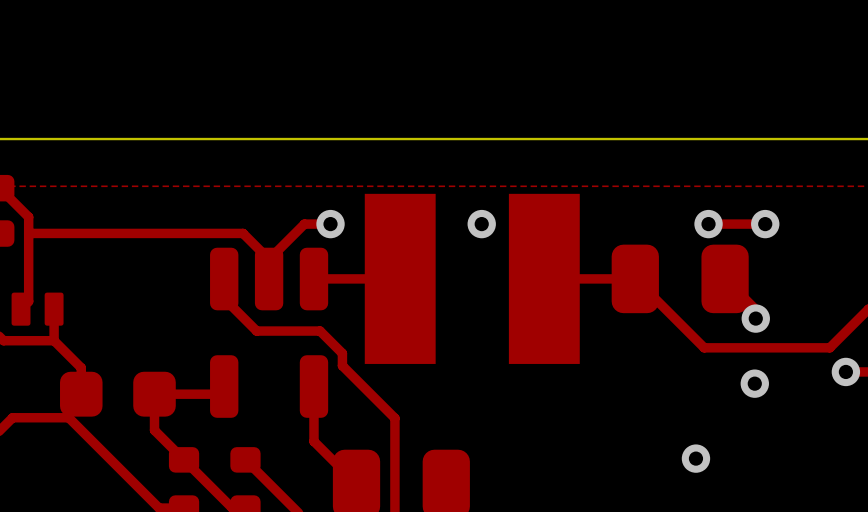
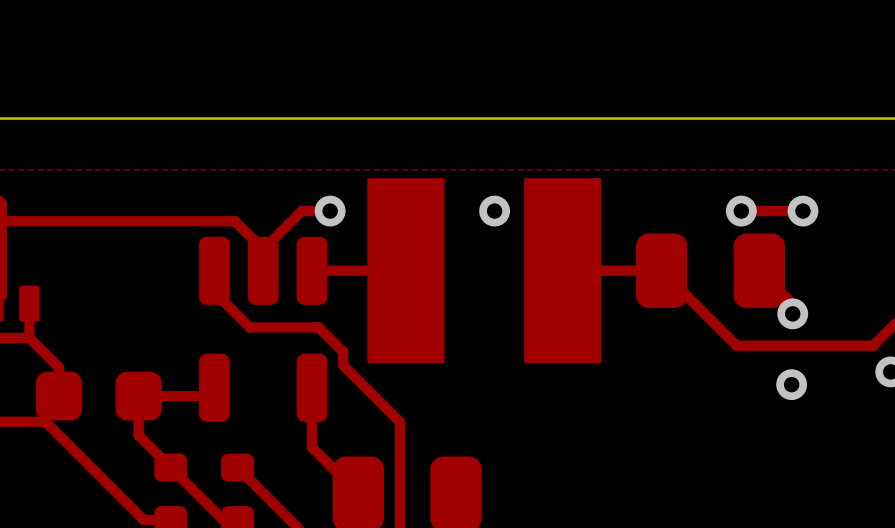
via: (695, 458) -> none

